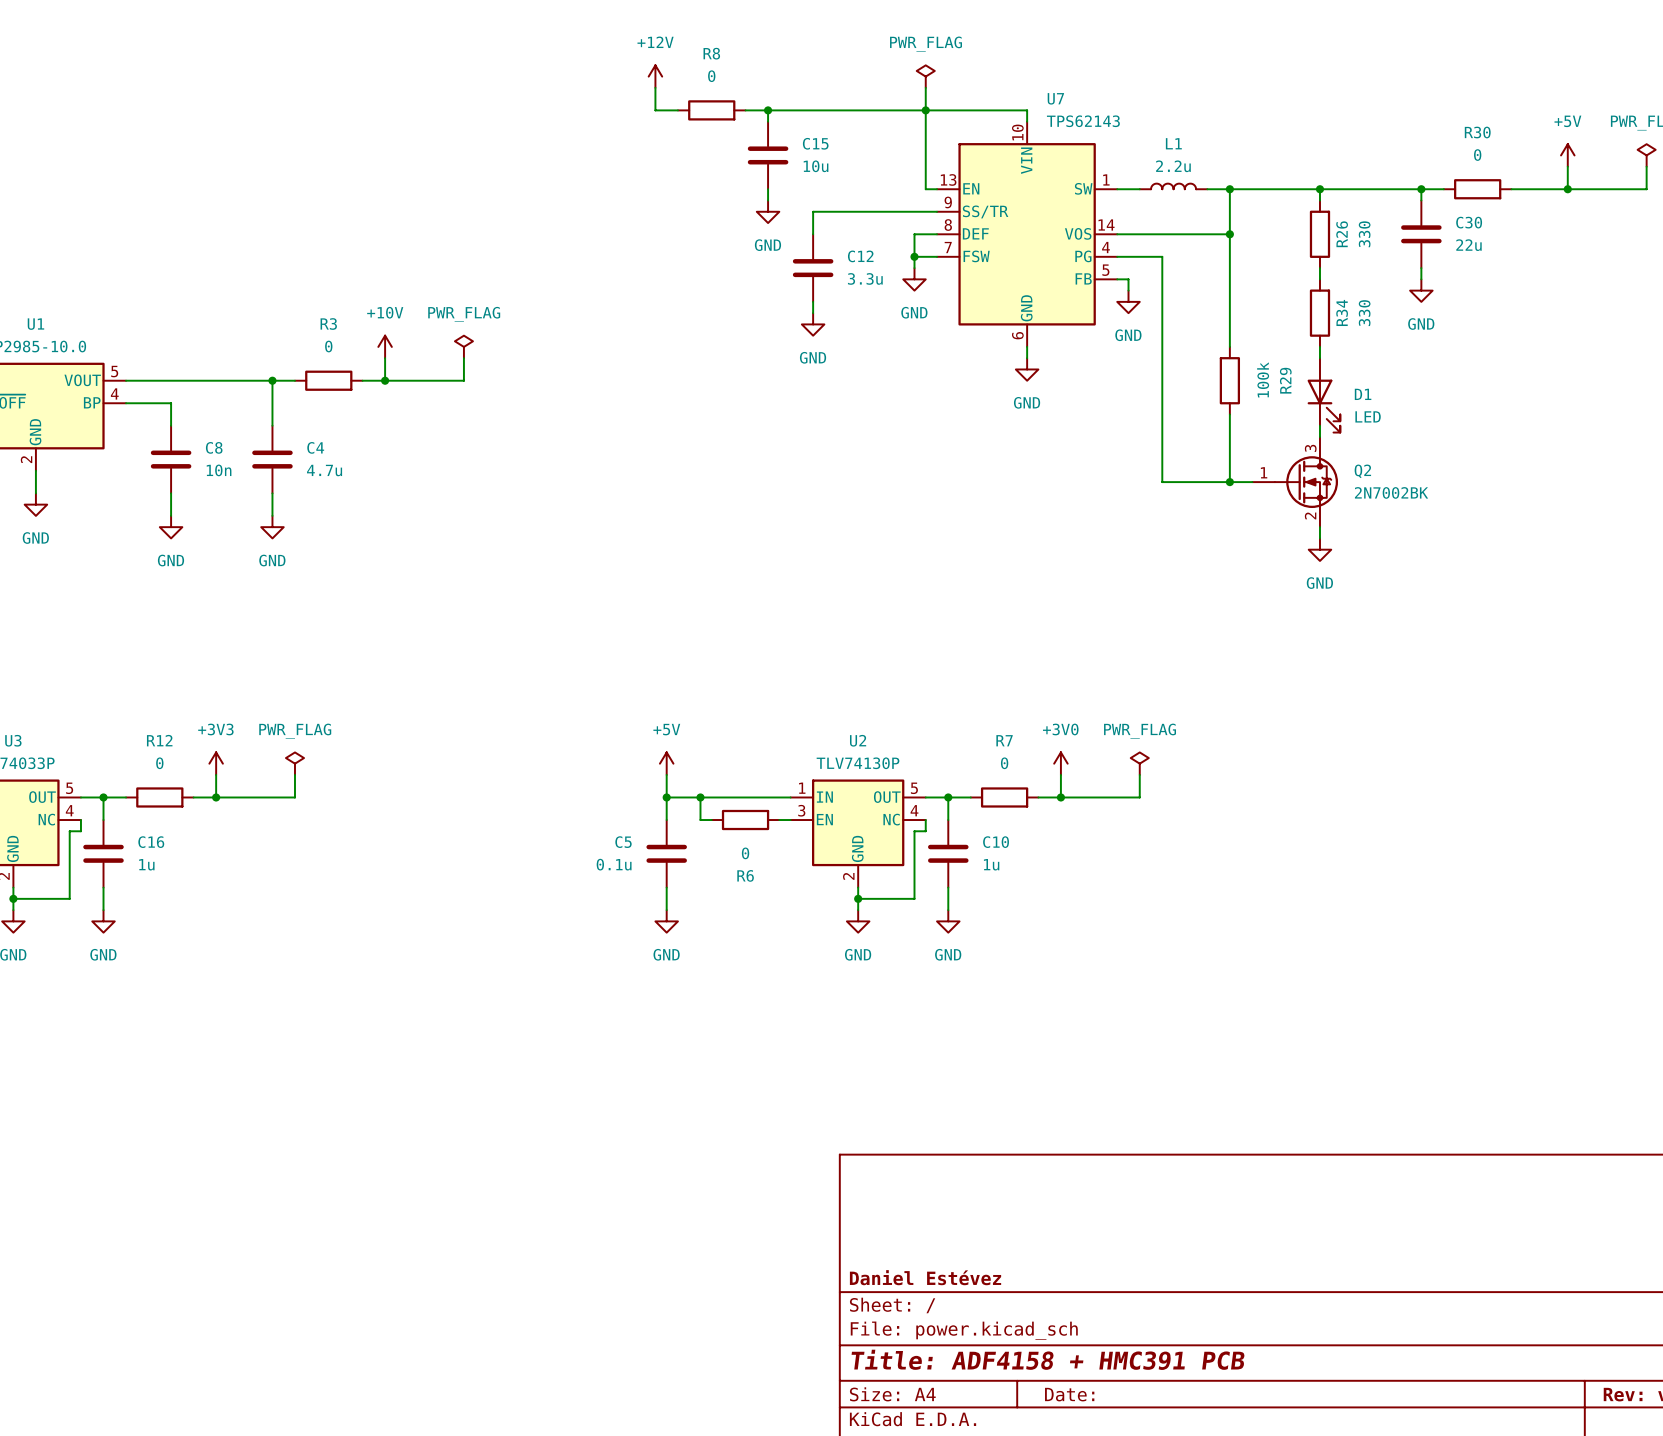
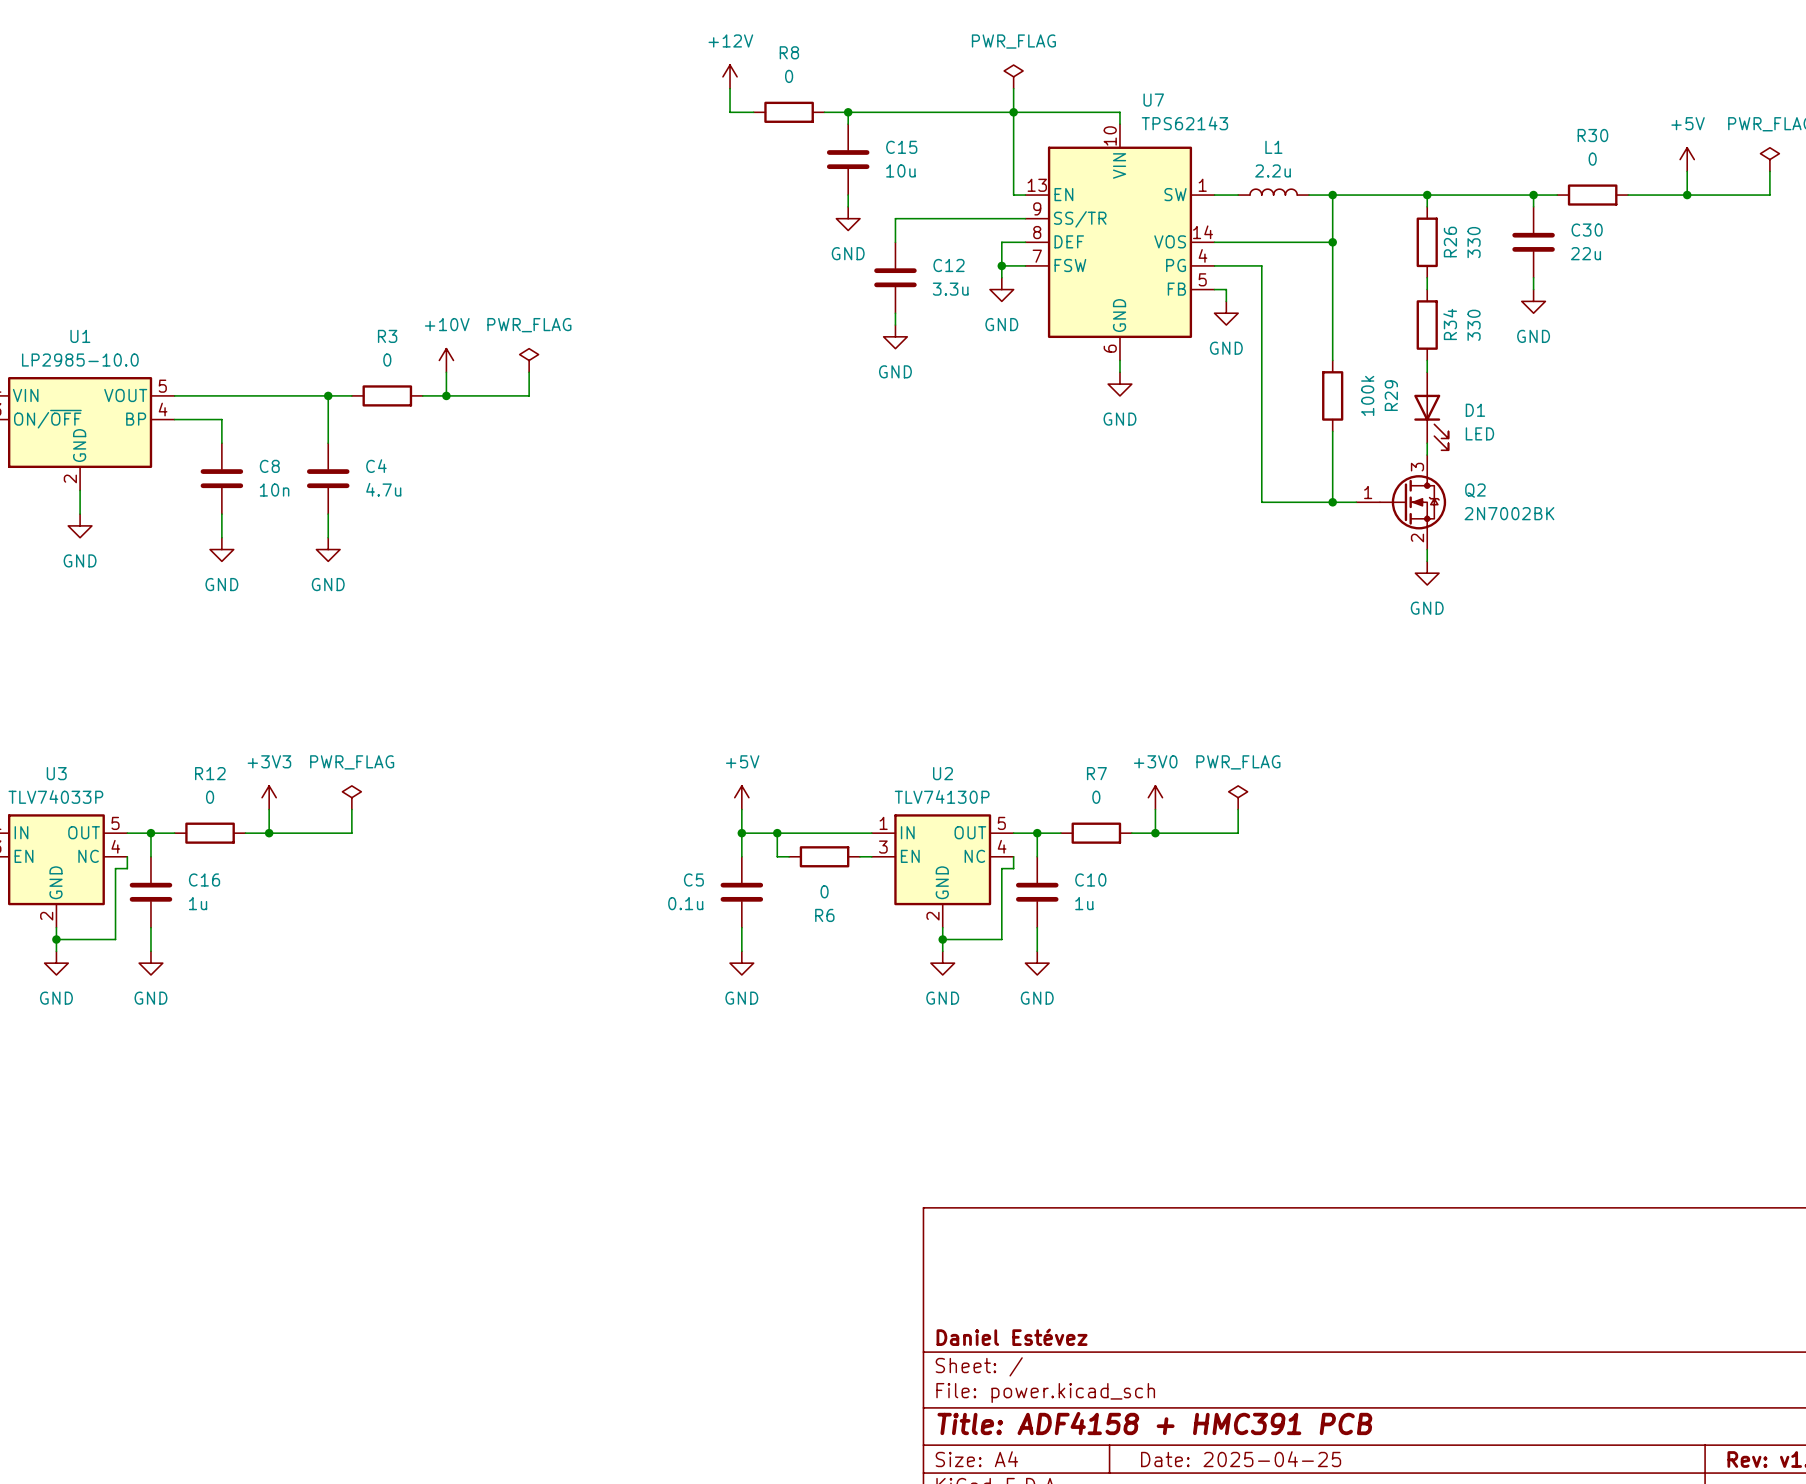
title block: Date: (1069, 1394) -> Date: 2025-04-25 (1241, 1459)

